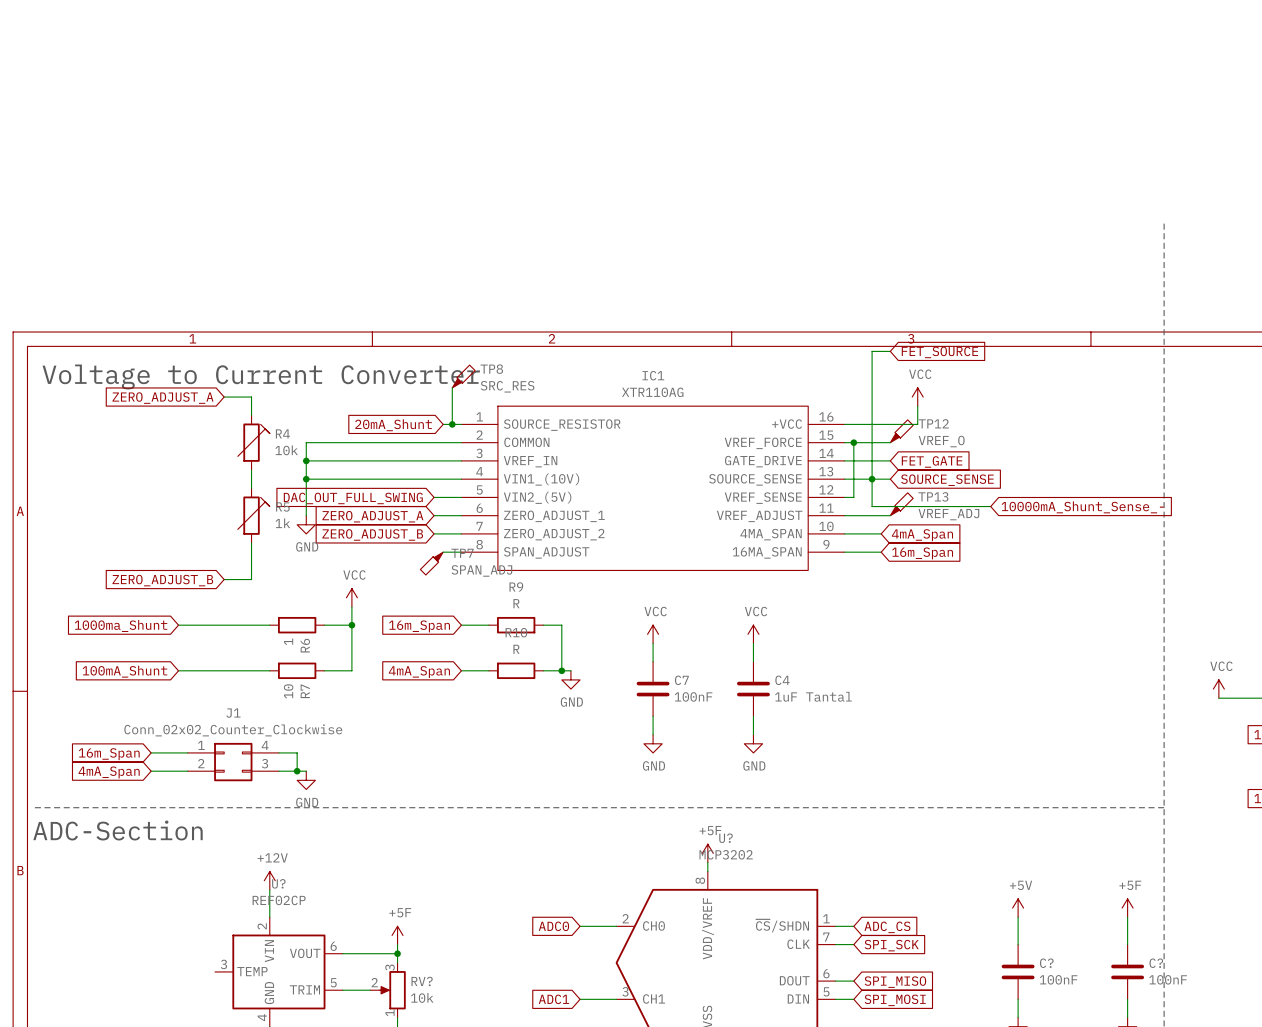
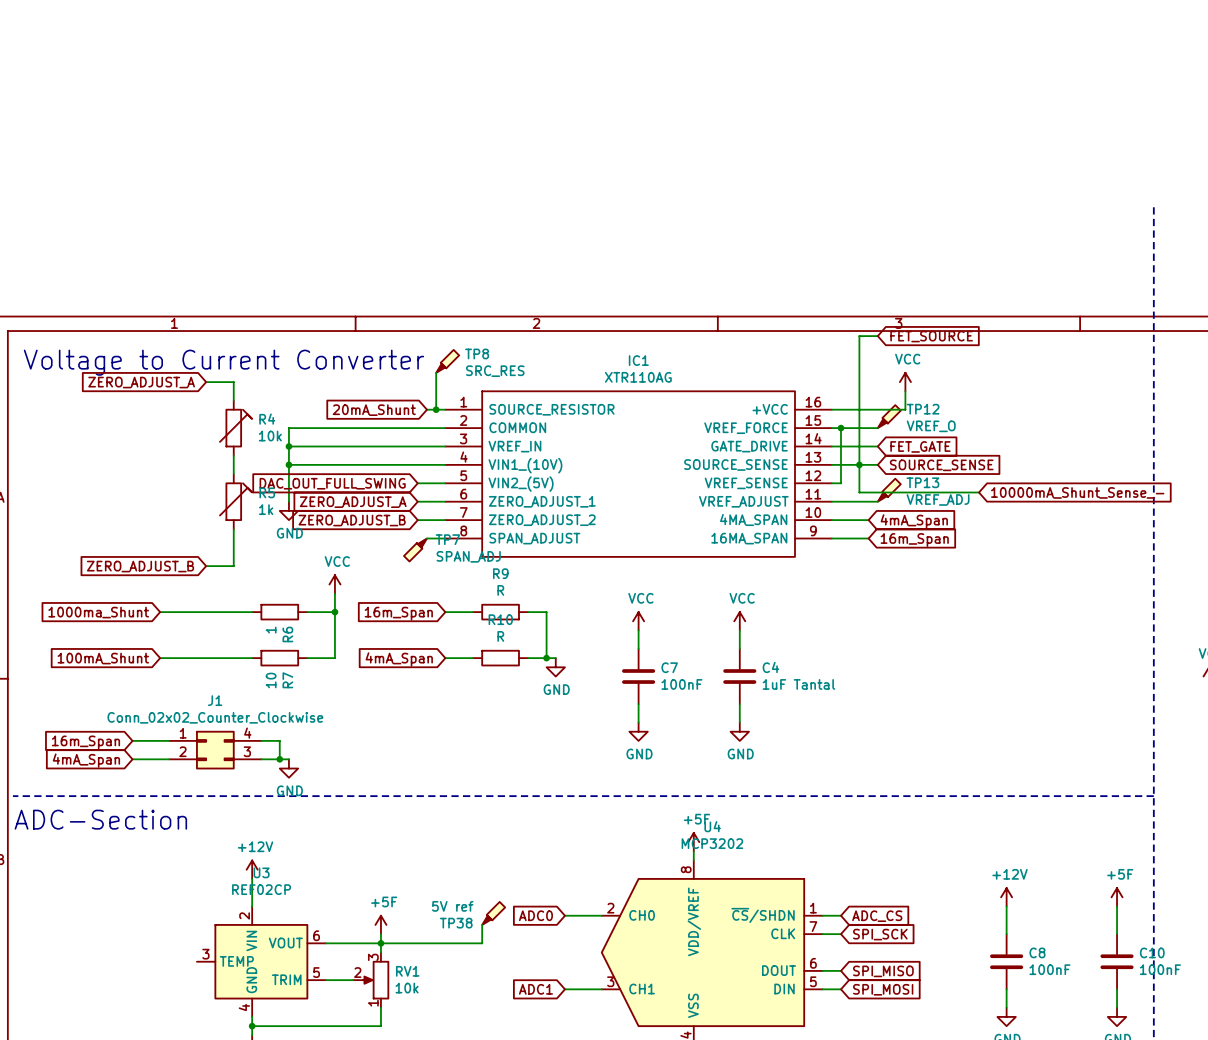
U? name: U? (726, 838) -> U4 (712, 826)
U? name: U? (278, 883) -> U3 (261, 872)
power symbol: +5V (1018, 908) -> +12V (1006, 897)
TP38: none -> 5V ref (493, 913)
wire: none -> (482, 924) (482, 943) (380, 943)
C? name: C? (1046, 963) -> C8 (1037, 952)
C? name: C? (1156, 963) -> C10 (1152, 952)
RV? name: RV? (422, 981) -> RV1 (407, 971)

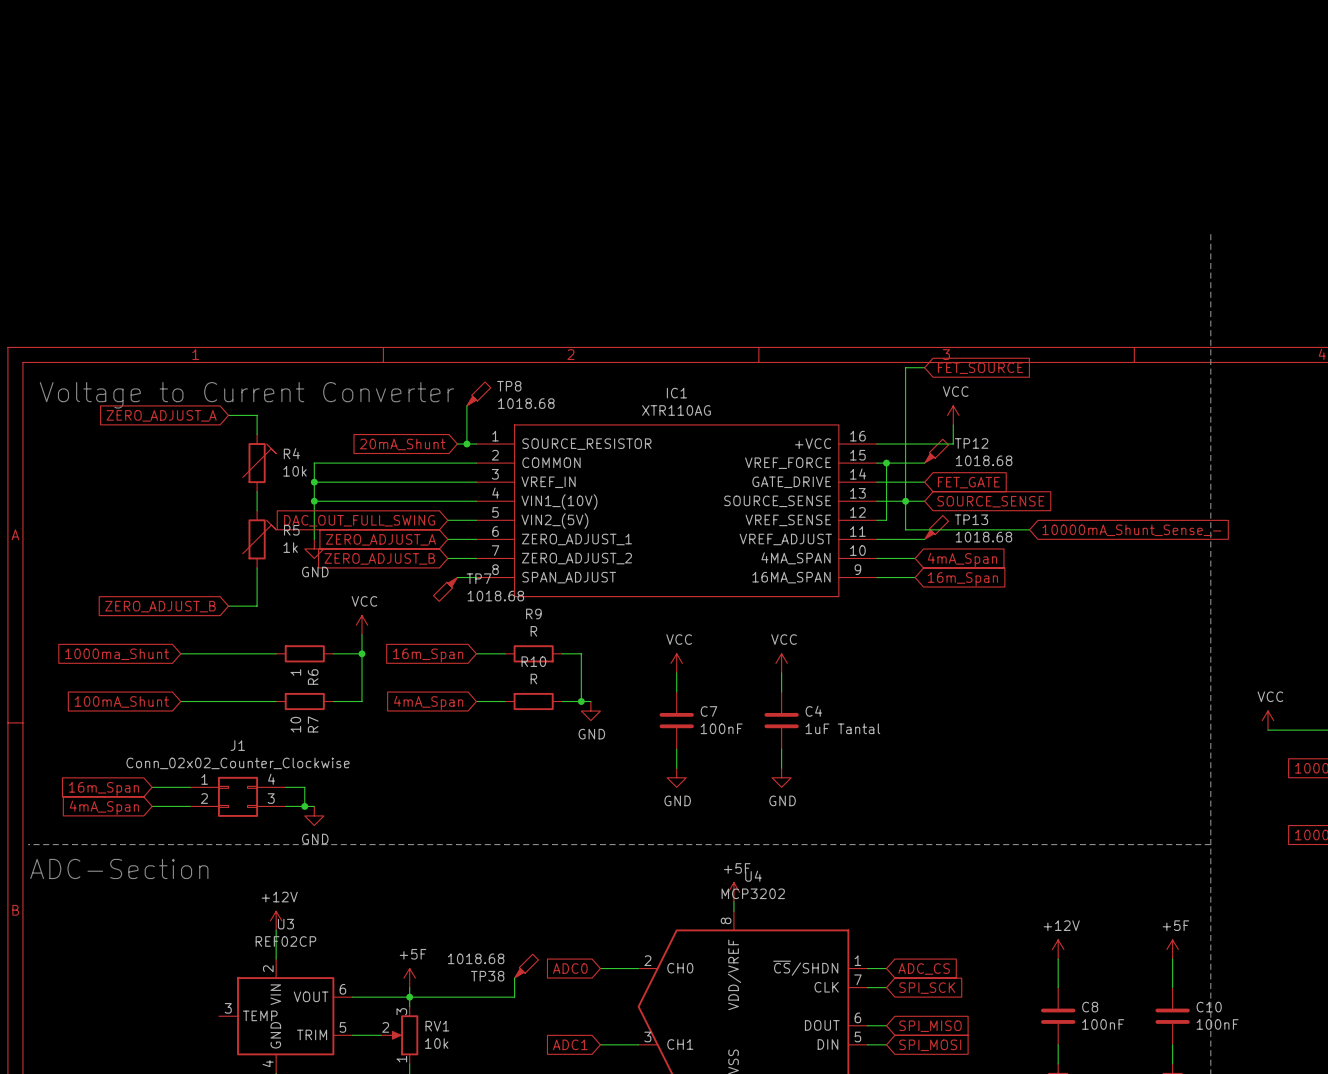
TP8 value: SRC_RES (495, 371) -> 1018.68 (526, 403)
TP12 value: VREF_O (931, 426) -> 1018.68 (984, 460)
TP13 value: VREF_ADJ (938, 499) -> 1018.68 (983, 537)
TP7 value: SPAN_ADJ (468, 556) -> 1018.68 (495, 596)
TP38 value: 5V ref (452, 906) -> 1018.68 (476, 958)

